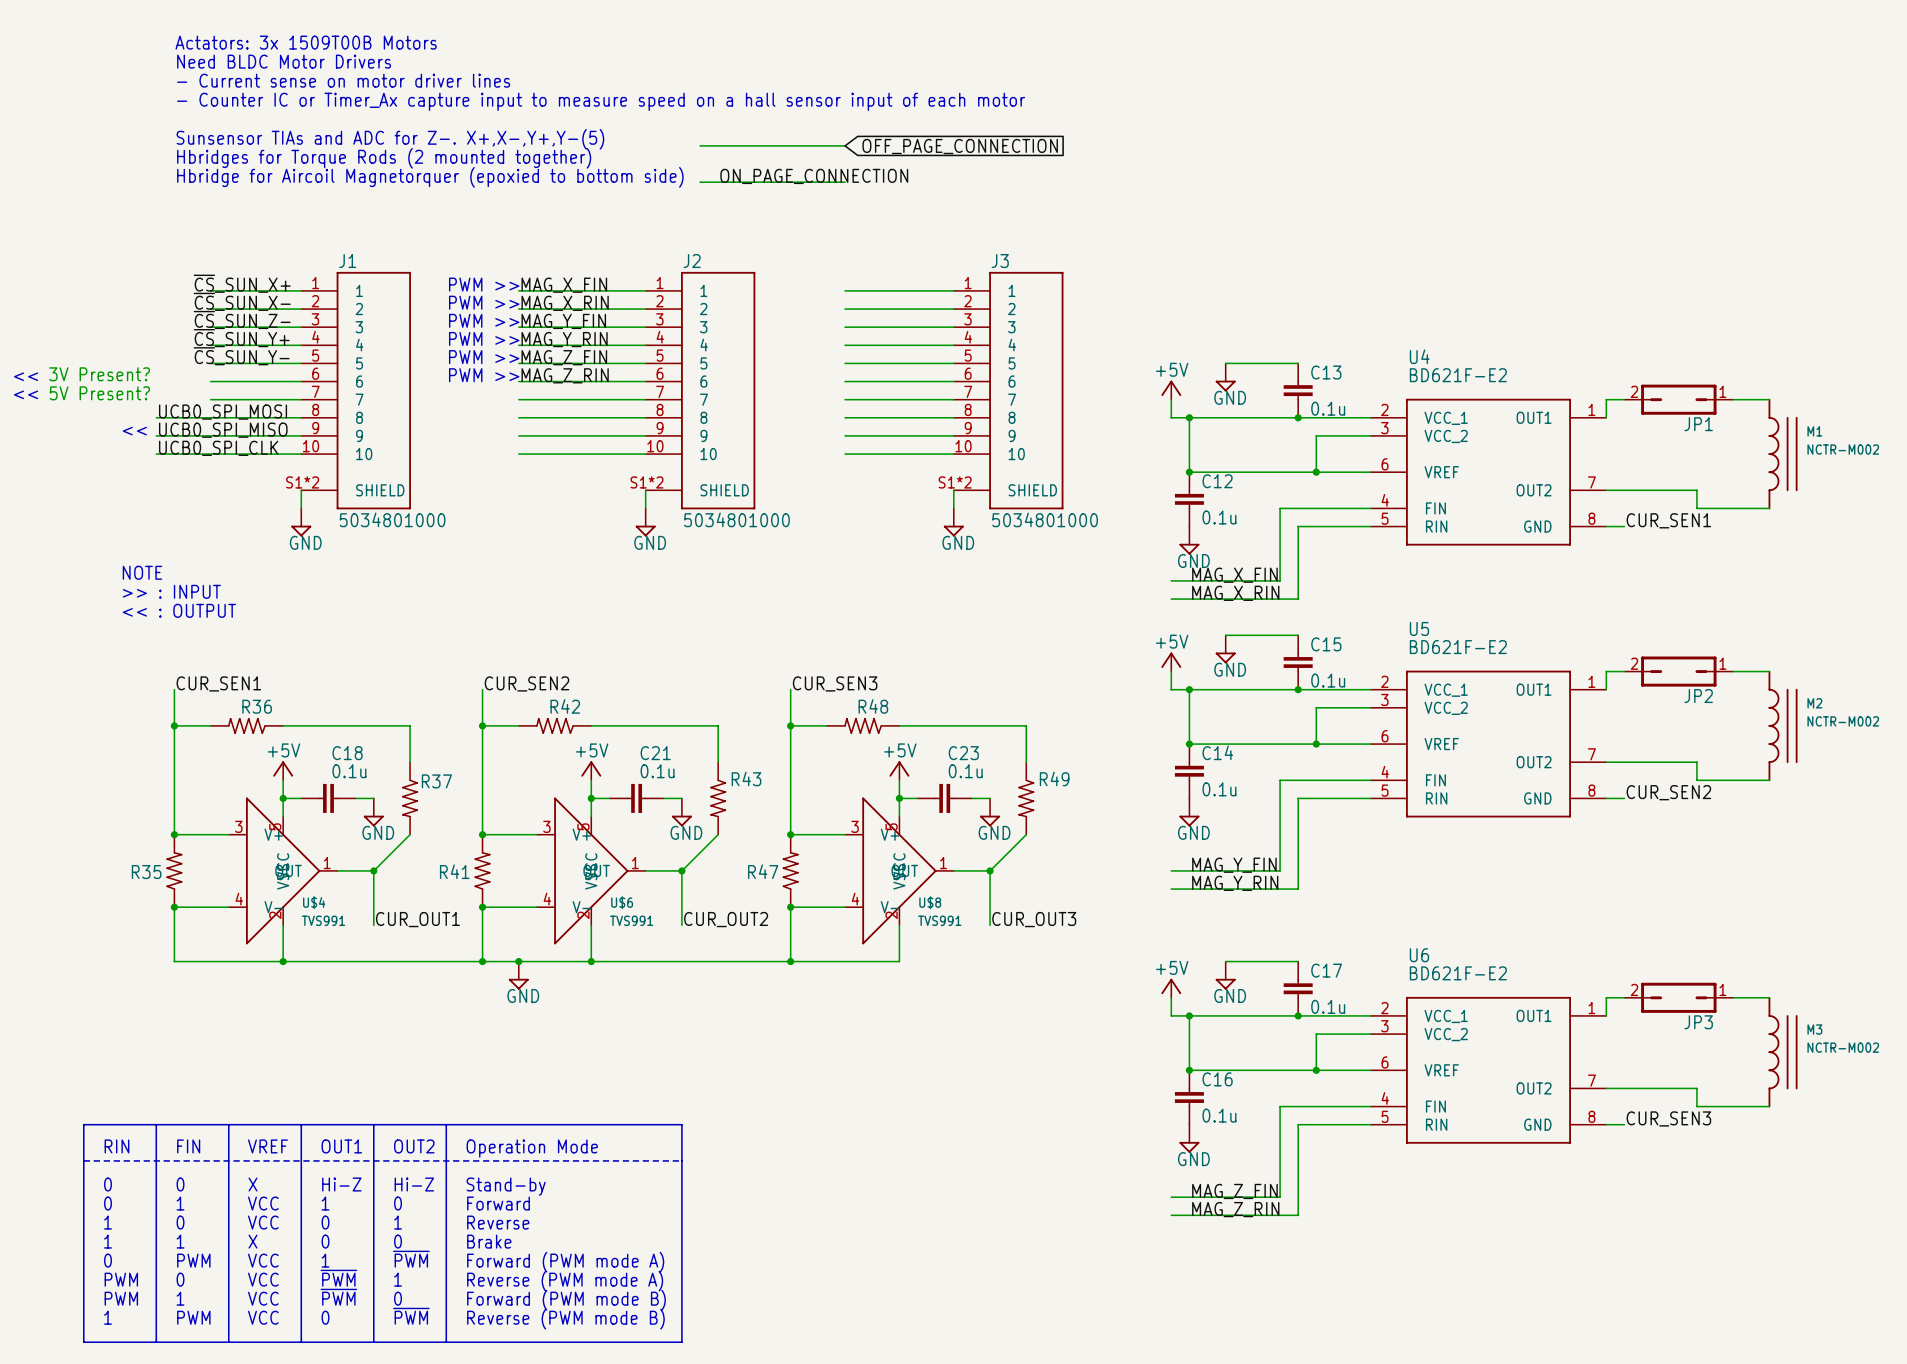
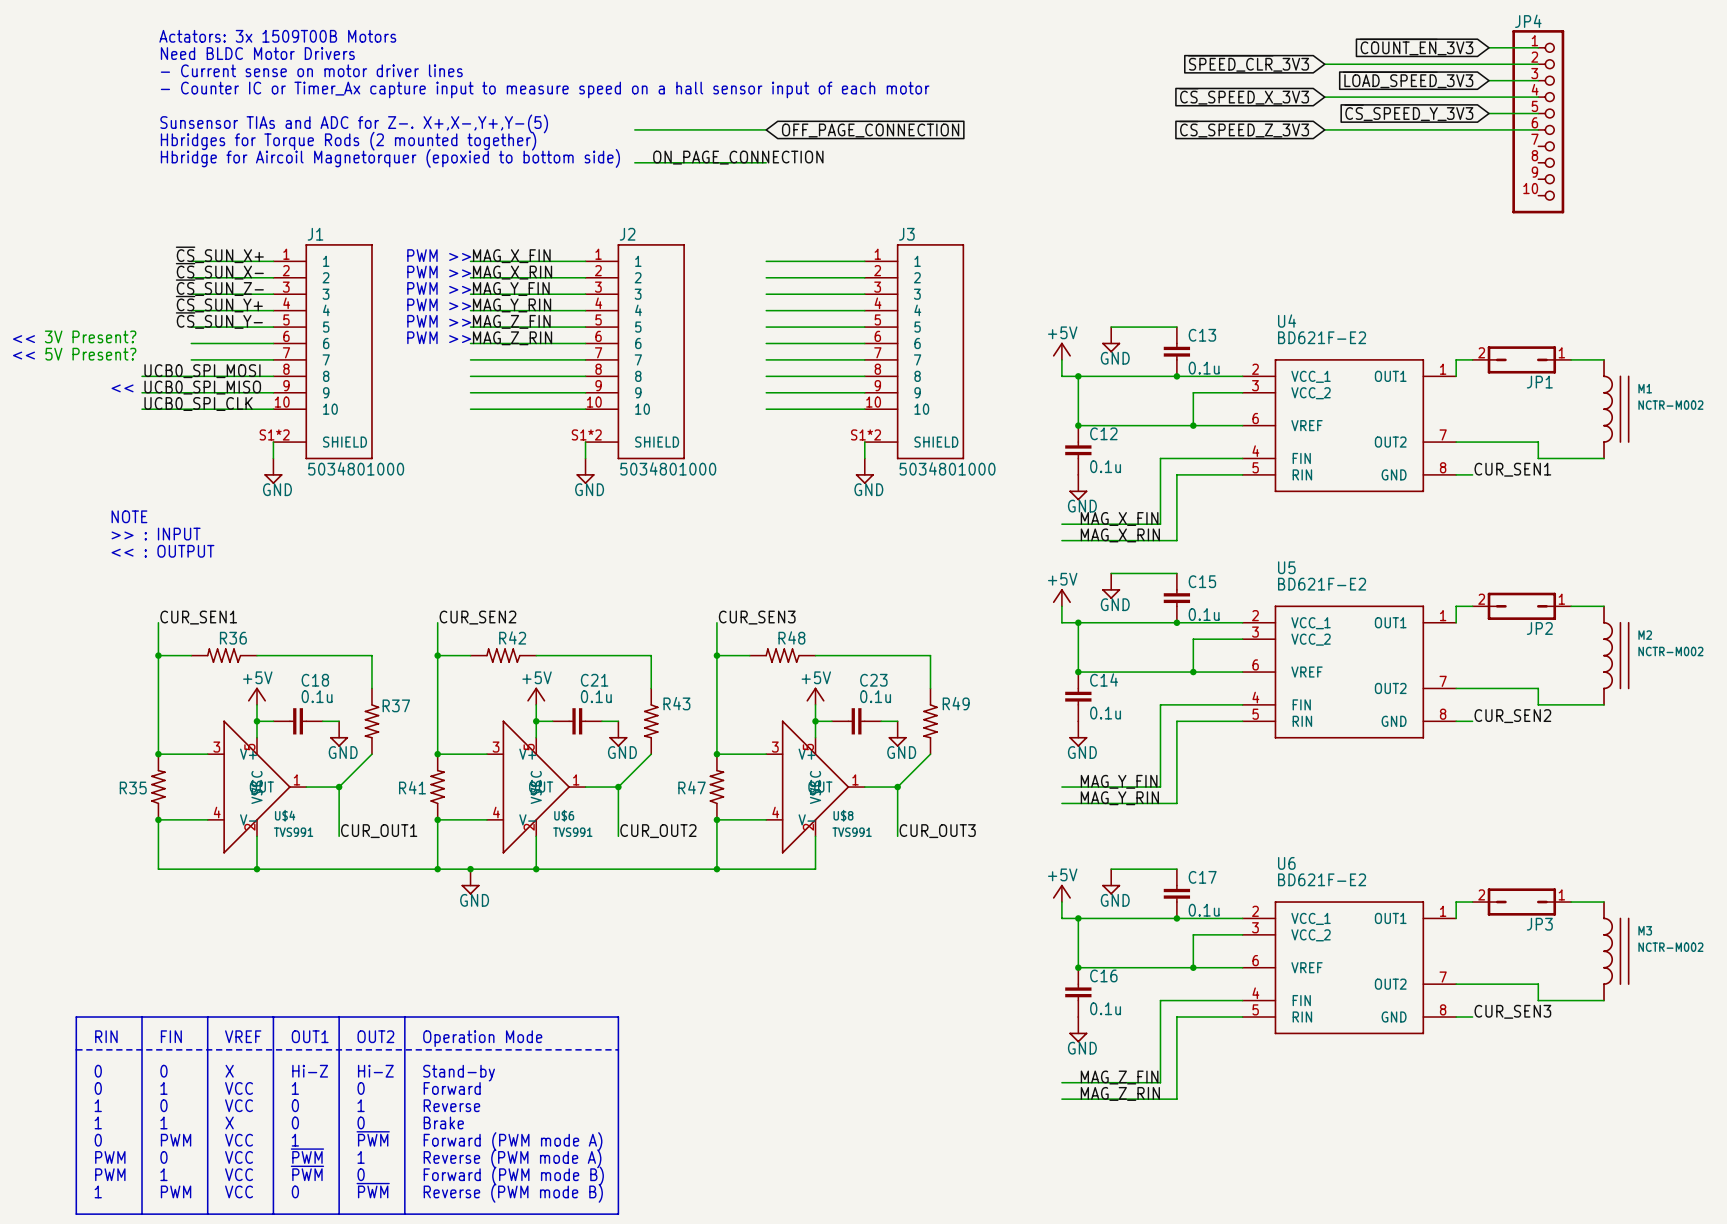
global label: none -> ~{COUNT_EN}_3V3 (1416, 47)
wire: none -> (1489, 47) (1538, 47)
global label: none -> ~{SPEED_CLR}_3V3 (1248, 63)
wire: none -> (1324, 64) (1538, 64)
global label: none -> ~{LOAD_SPEED}_3V3 (1408, 79)
wire: none -> (1489, 80) (1538, 80)
global label: none -> ~{CS}_SPEED_X_3V3 (1244, 96)
wire: none -> (1324, 97) (1538, 97)
global label: none -> ~{CS}_SPEED_Y_3V3 (1408, 112)
wire: none -> (1489, 113) (1538, 113)
JP4: none -> (1538, 121)
global label: none -> ~{CS}_SPEED_Z_3V3 (1244, 129)
wire: none -> (1324, 129) (1538, 129)

